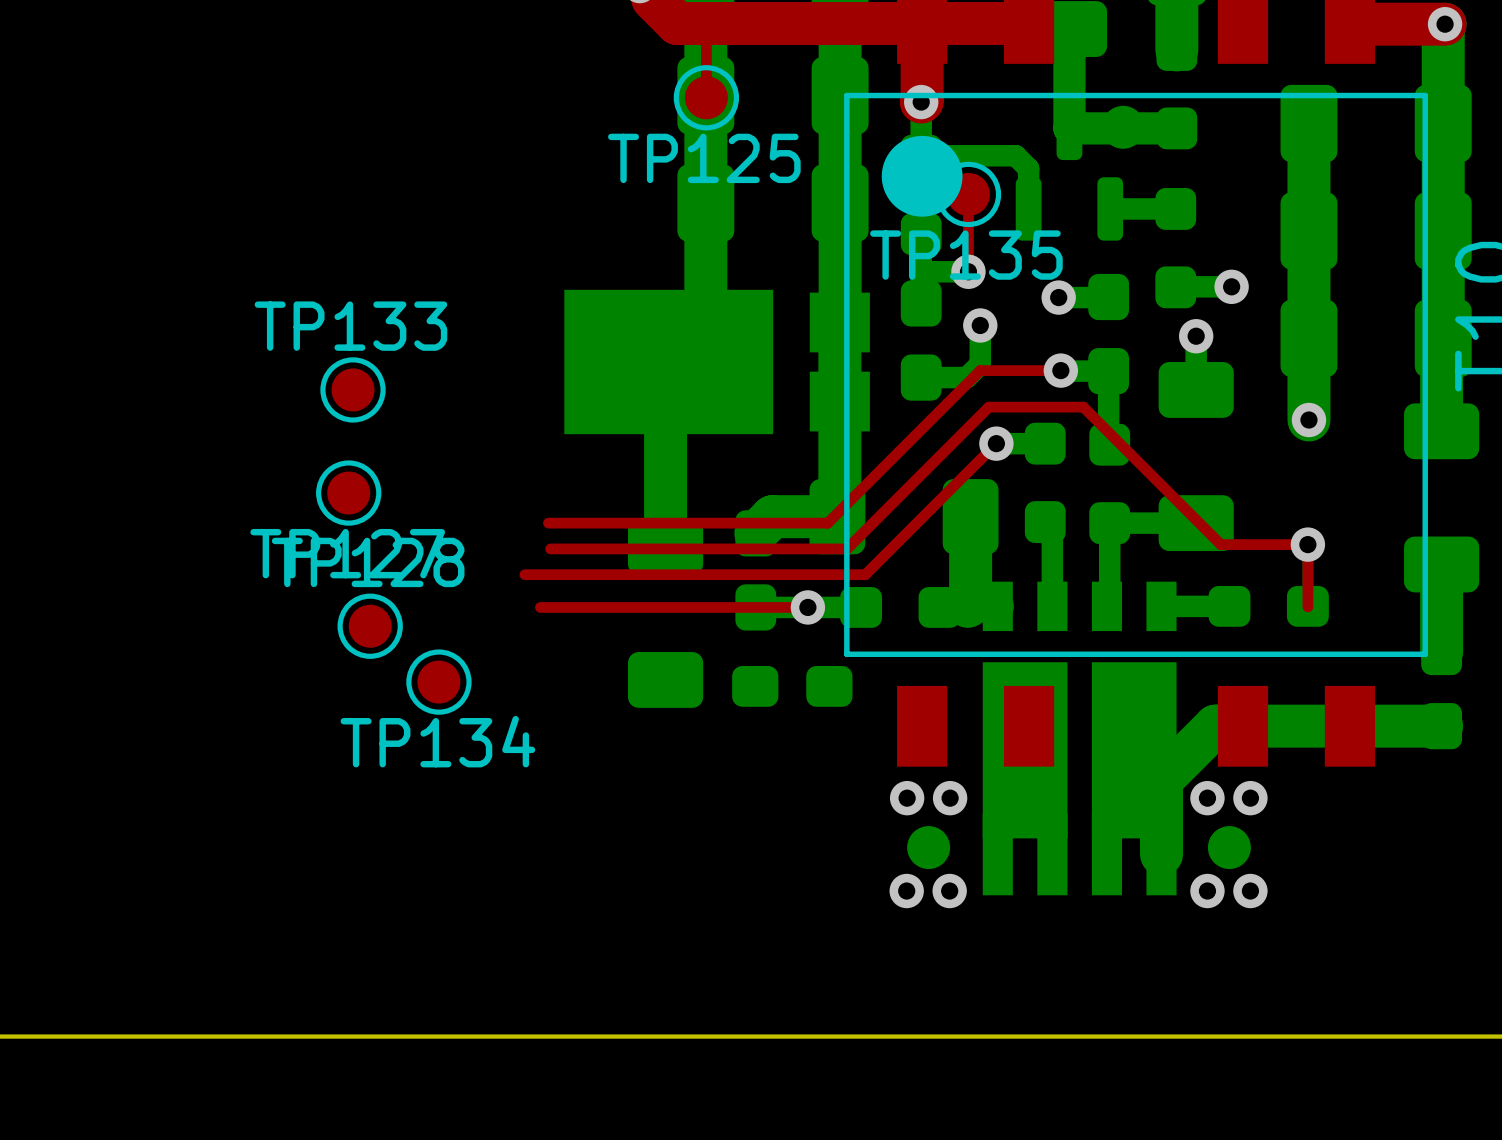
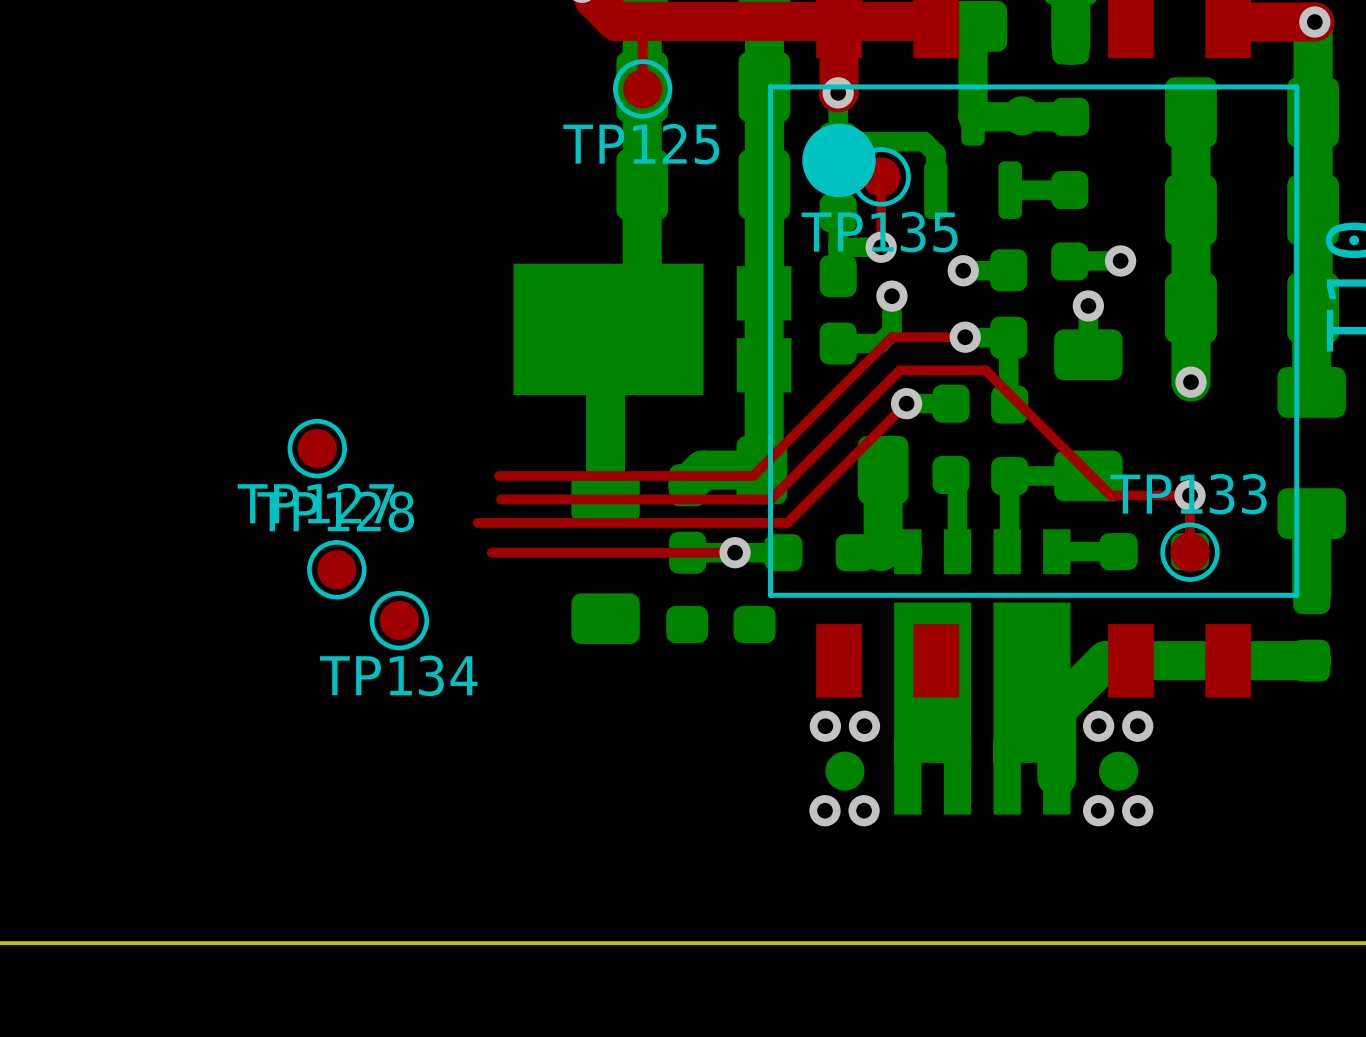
TP133 position: (353, 389) -> (1190, 552)

